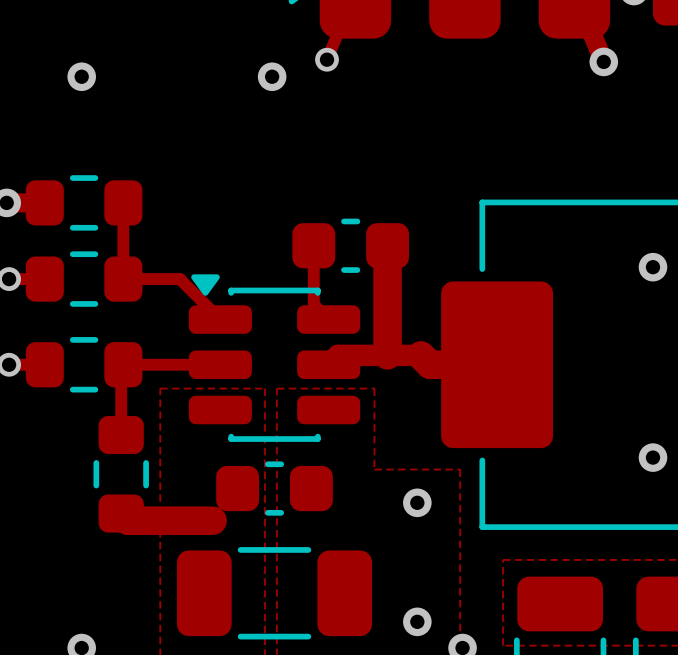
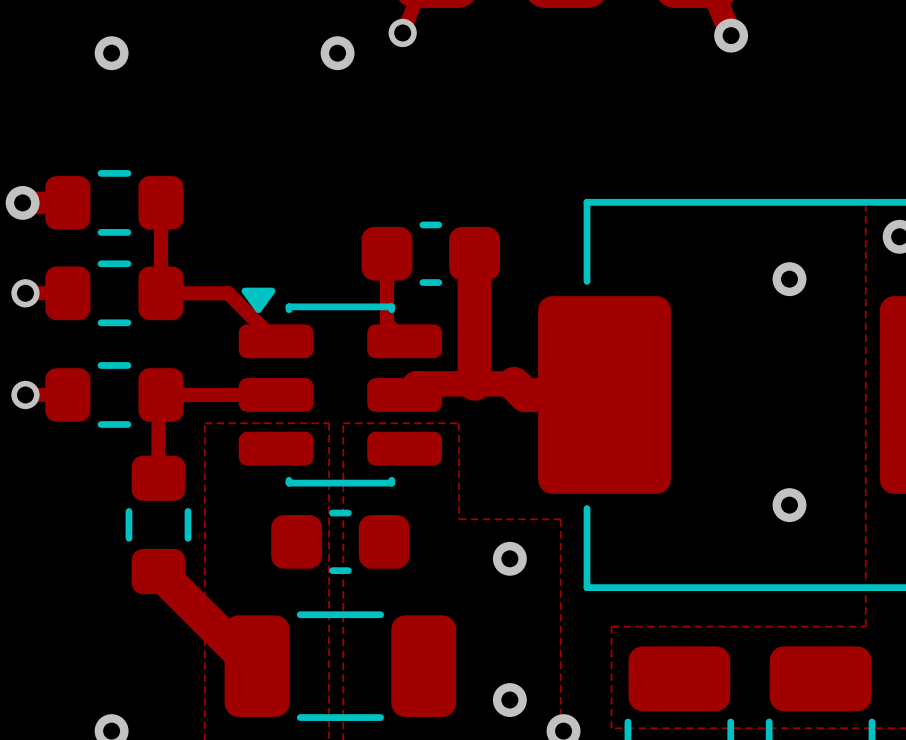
top track: (128, 520) (212, 520) -> (167, 580) (253, 666) (257, 666)

